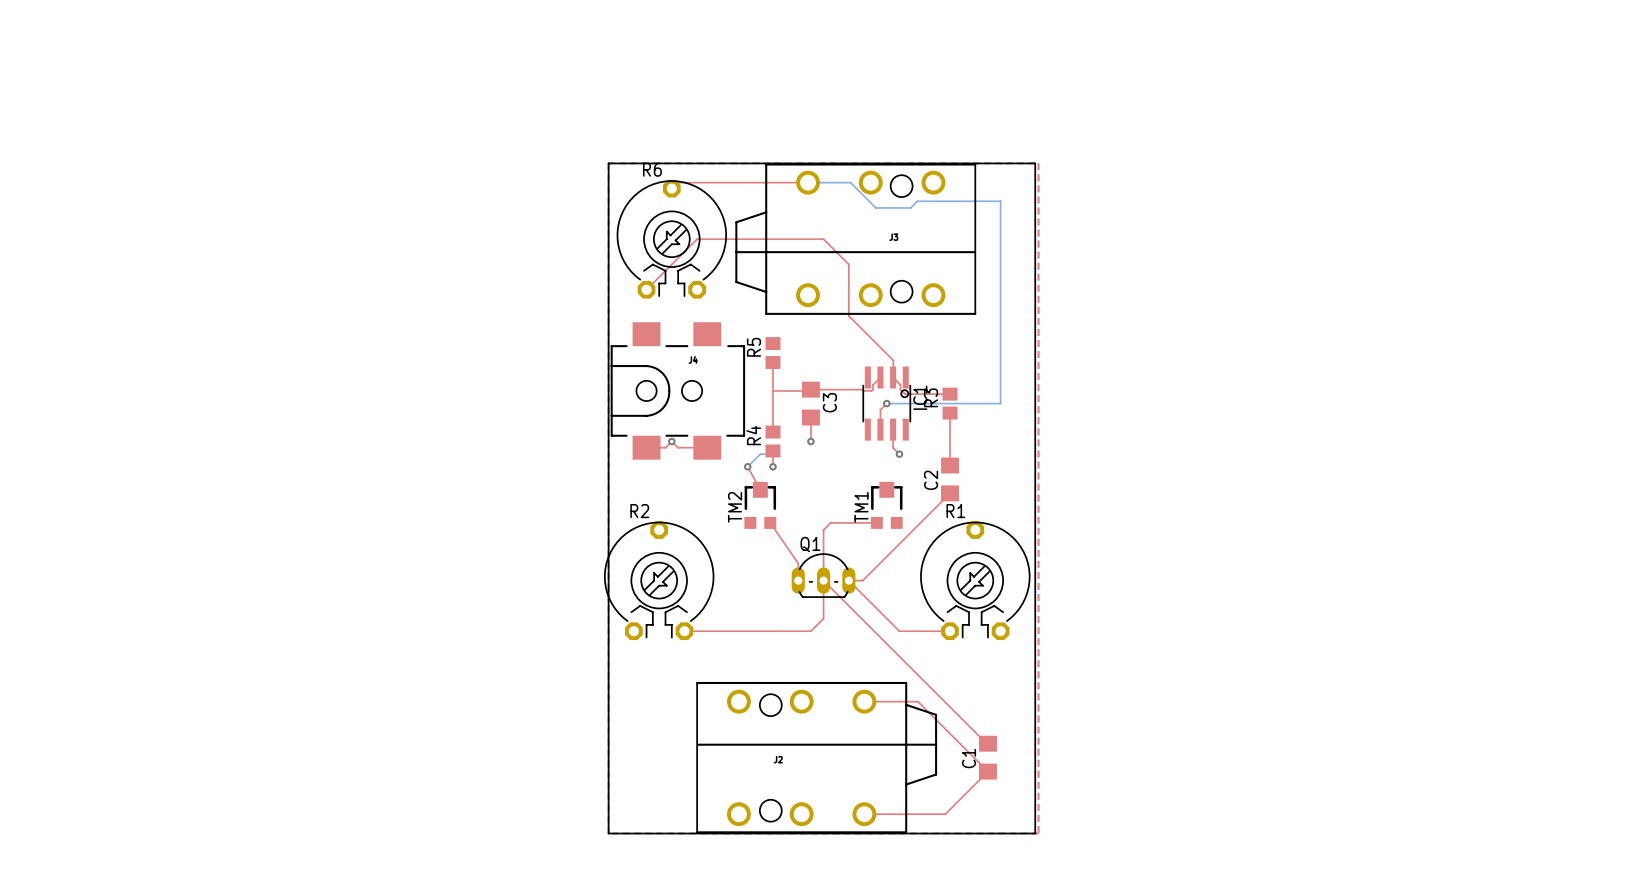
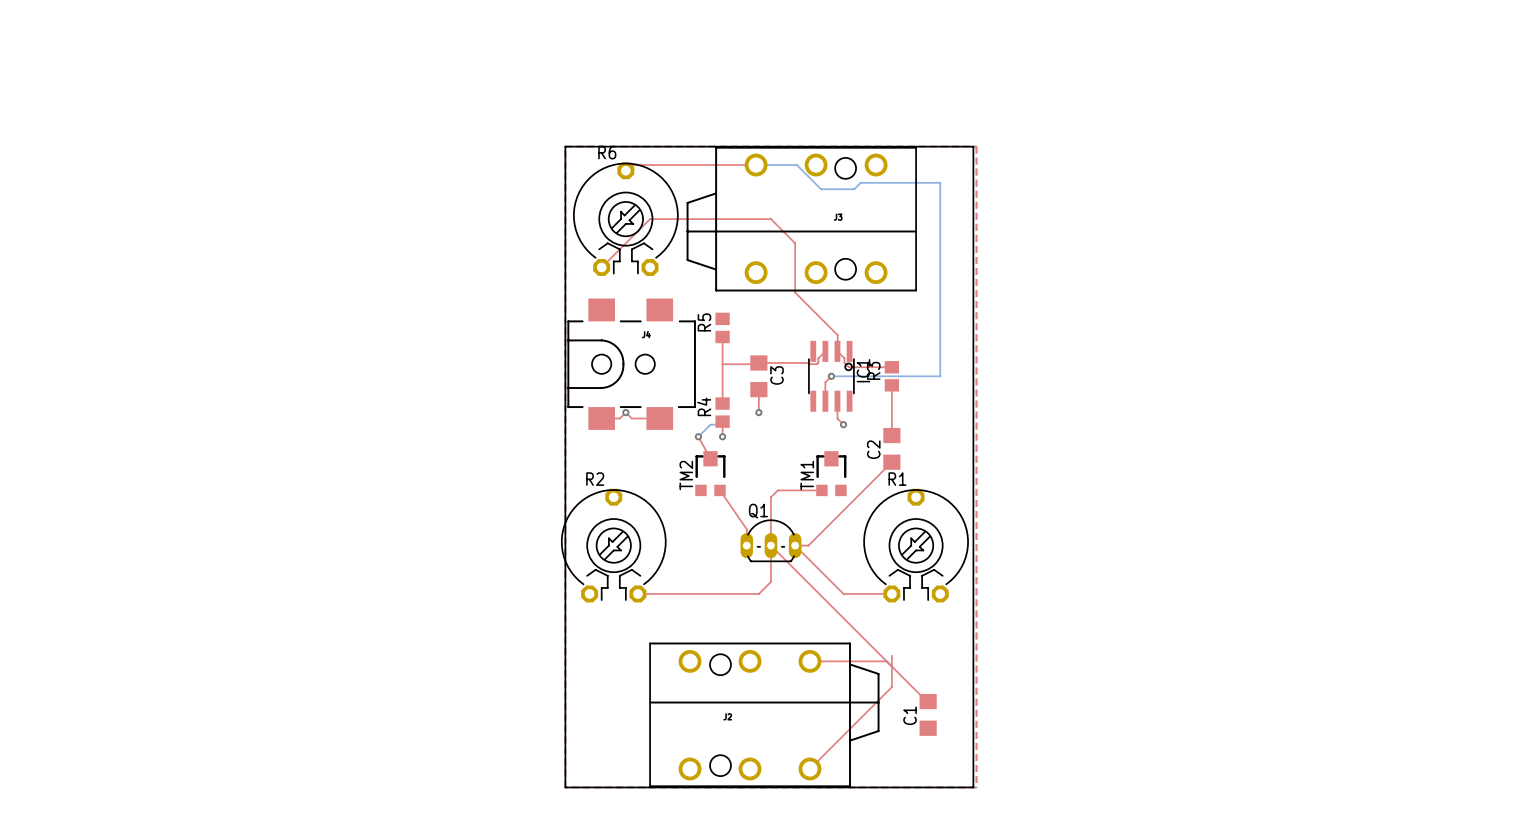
top track: (918, 701) (987, 771) (945, 814) (864, 814) -> (891, 655) (891, 687) (810, 768)
top track: none -> (861, 661) (886, 661)

